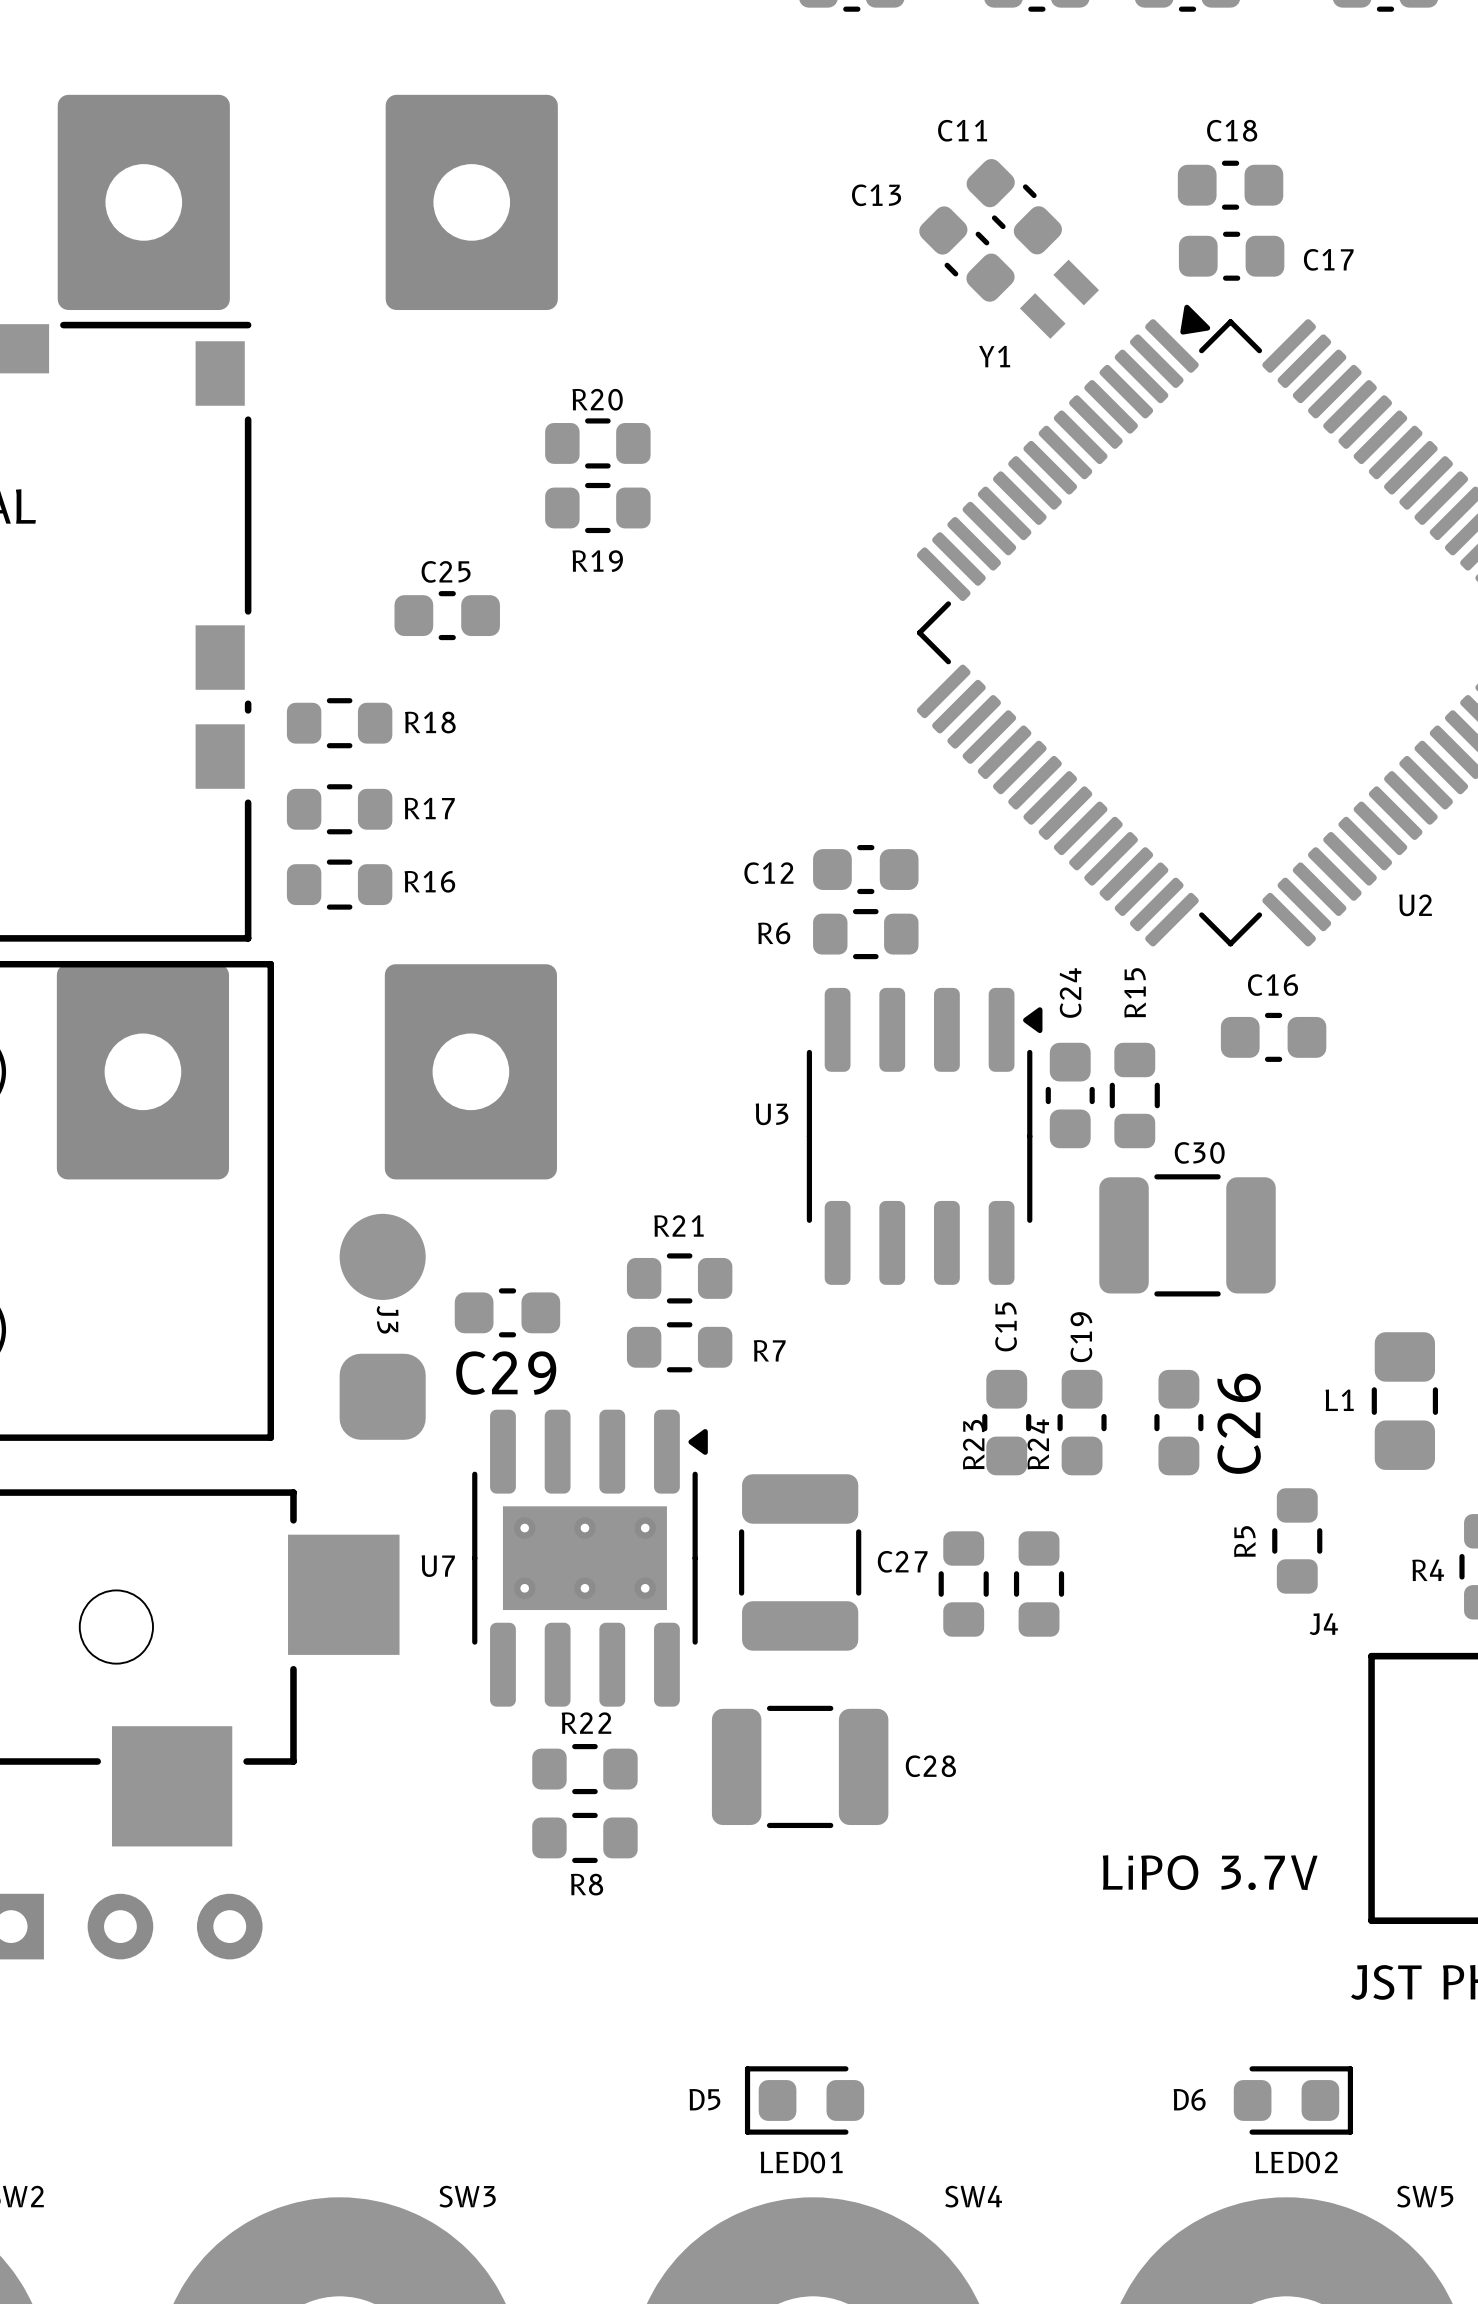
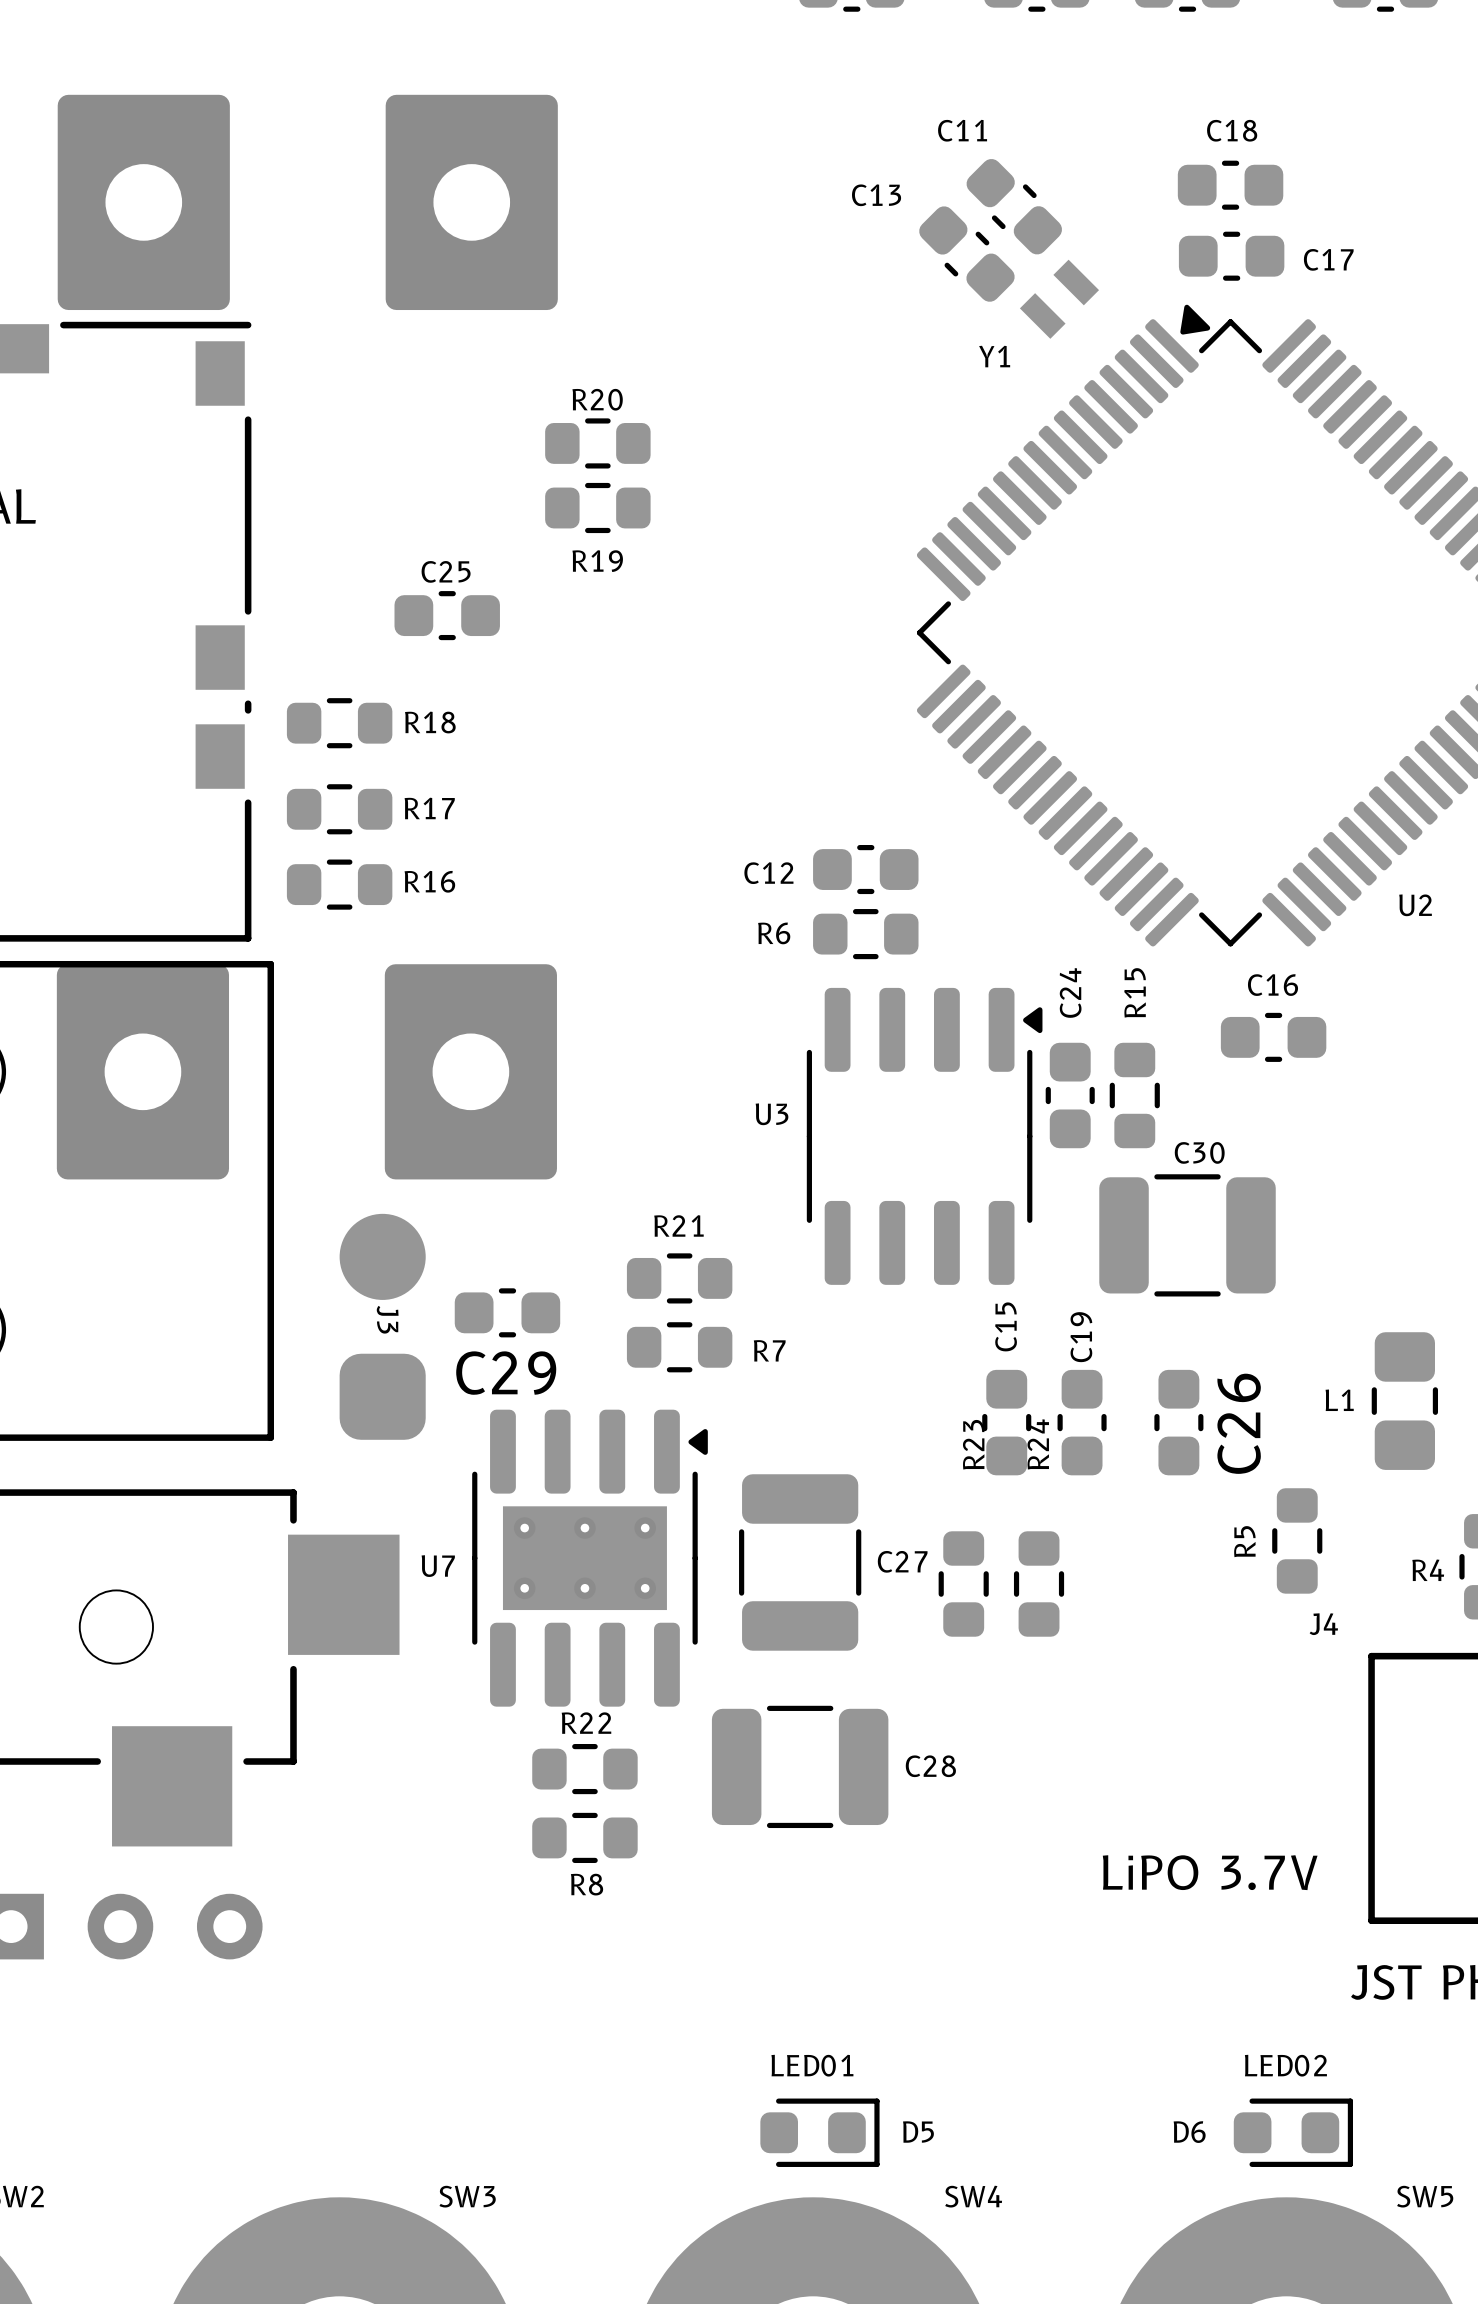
D5 rotation: 0° (804, 2100) -> 180° (819, 2132)
D6 position: (1293, 2100) -> (1293, 2132)
text position: LED01 (801, 2162) -> LED01 (812, 2065)
text position: LED02 (1296, 2162) -> LED02 (1285, 2065)

